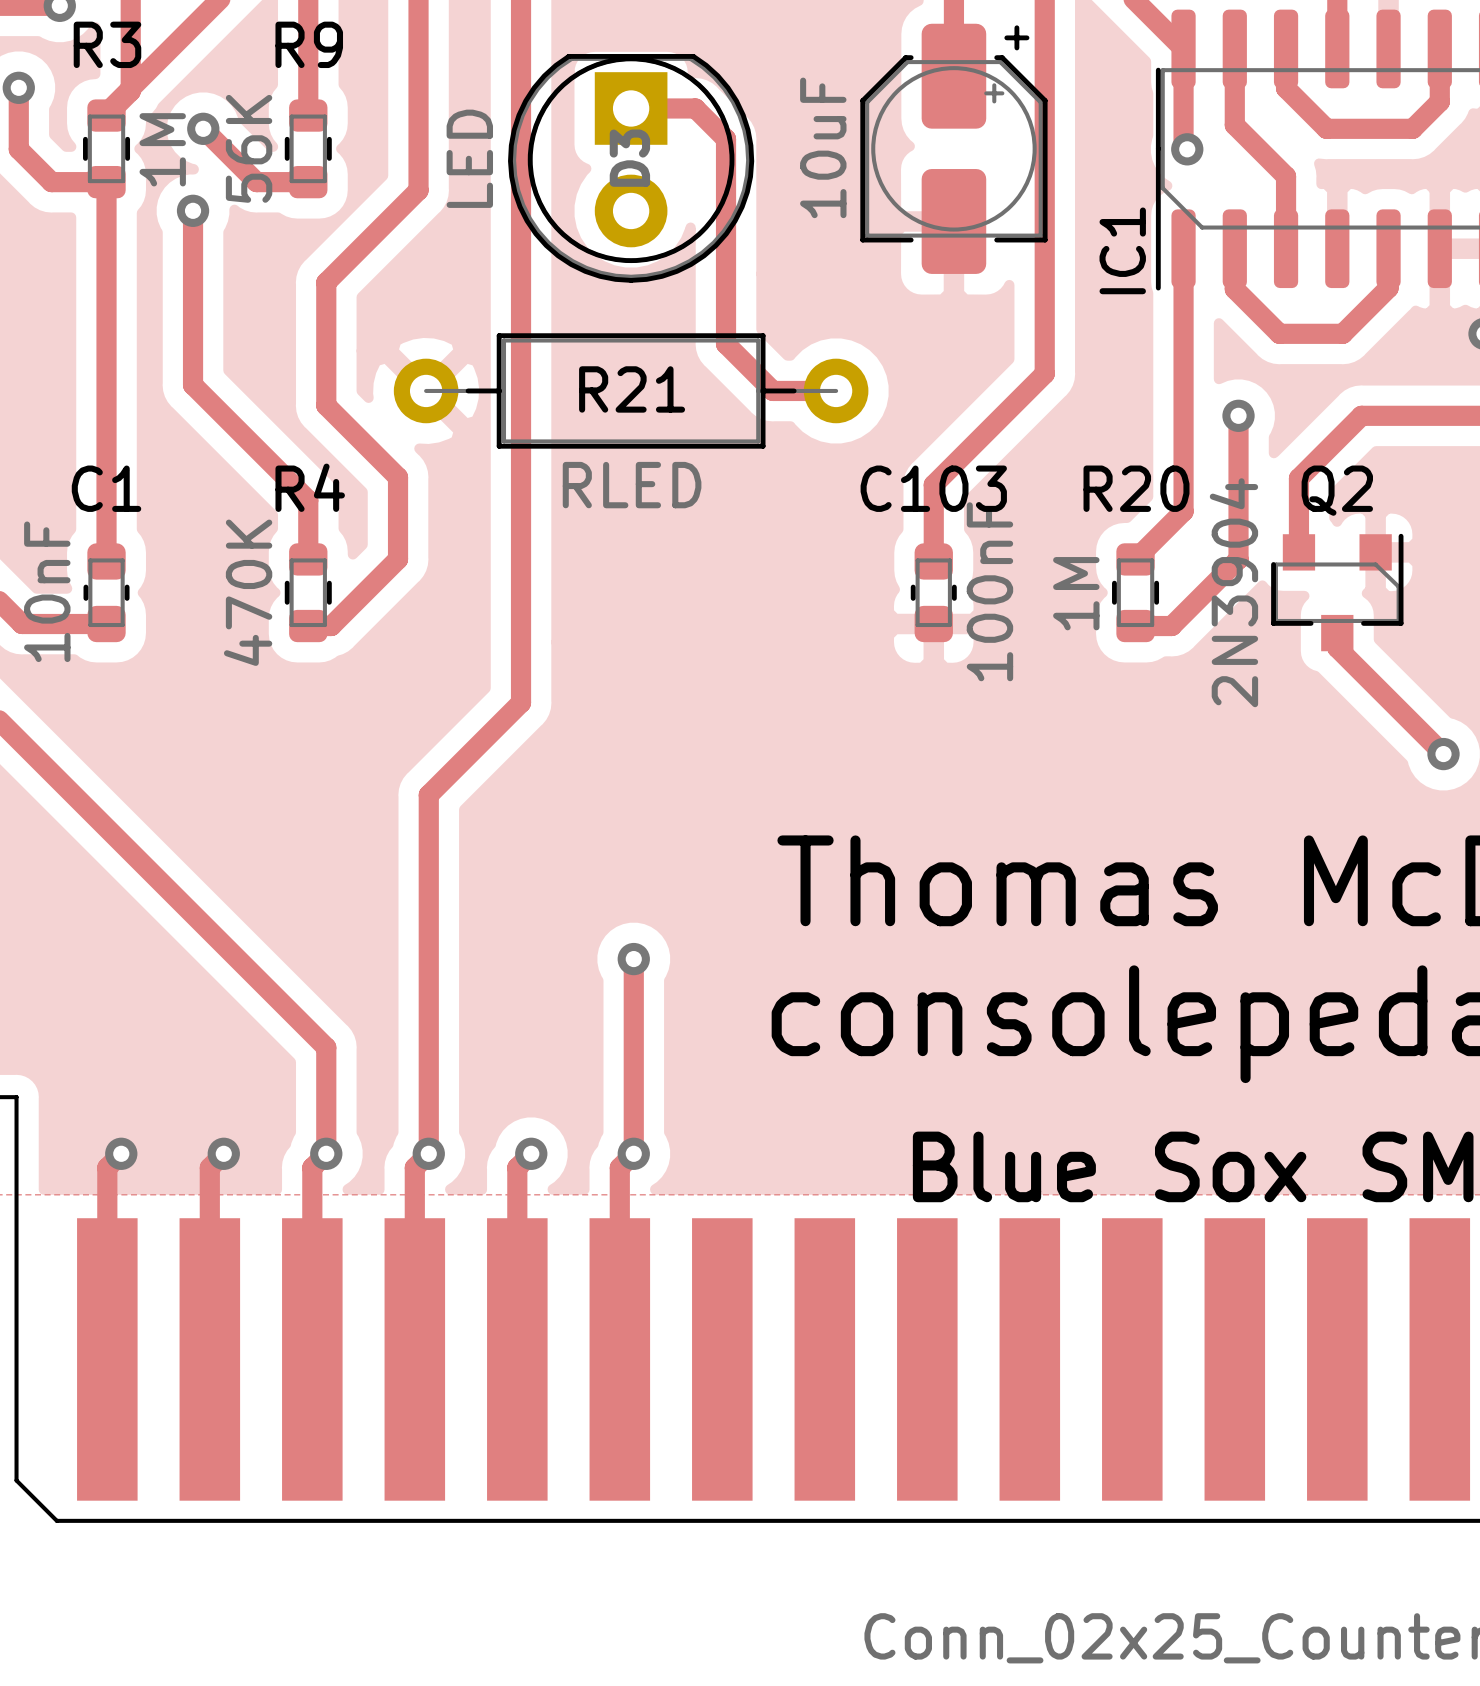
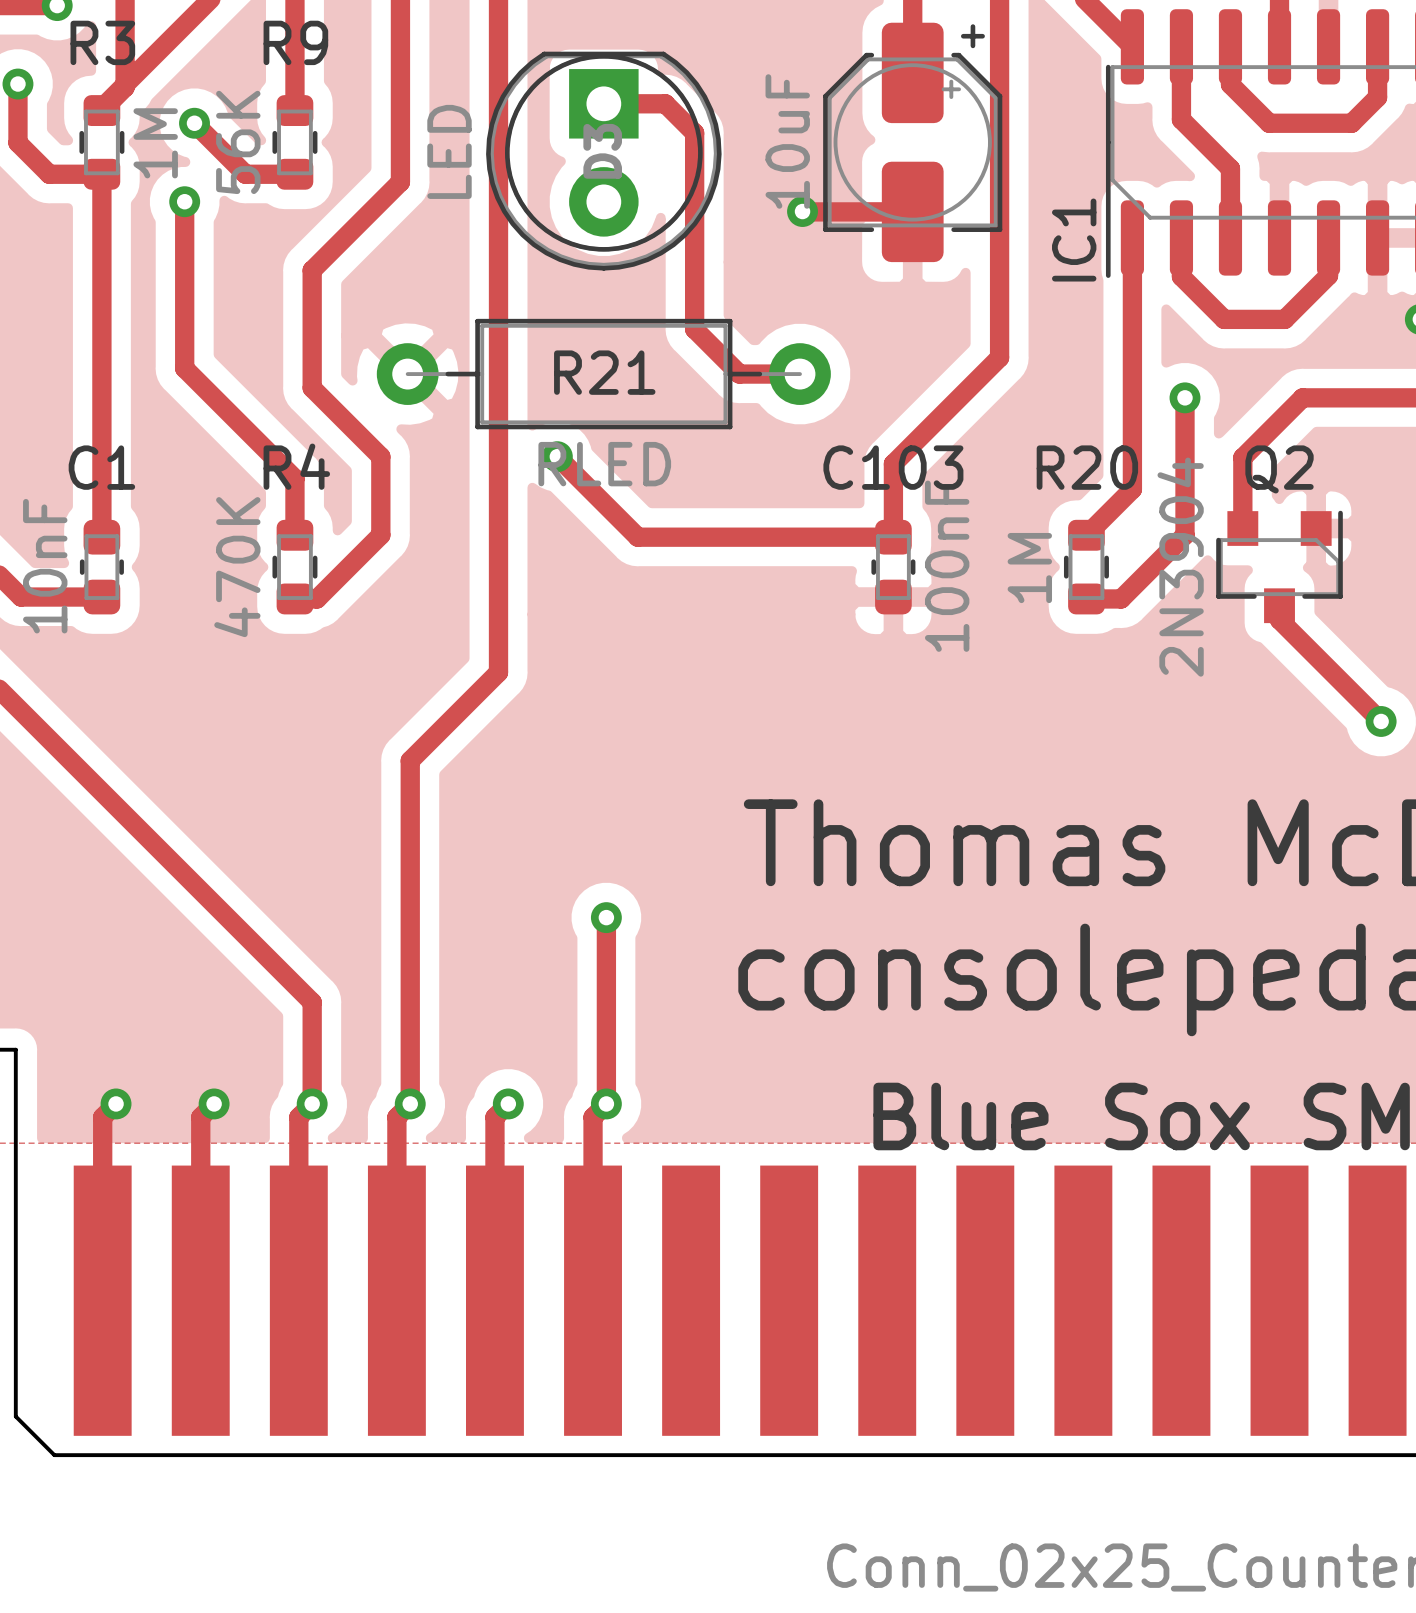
track: (1183, 48) (1183, 145) (1187, 149) -> none
via: (1187, 149) -> none
via: none -> (802, 211)
track: none -> (802, 211) (912, 211)
track: none -> (557, 456) (637, 537) (893, 537)
via: none -> (557, 456)

